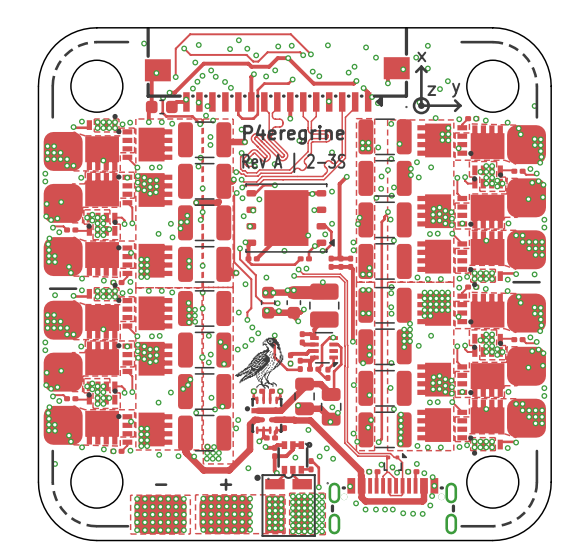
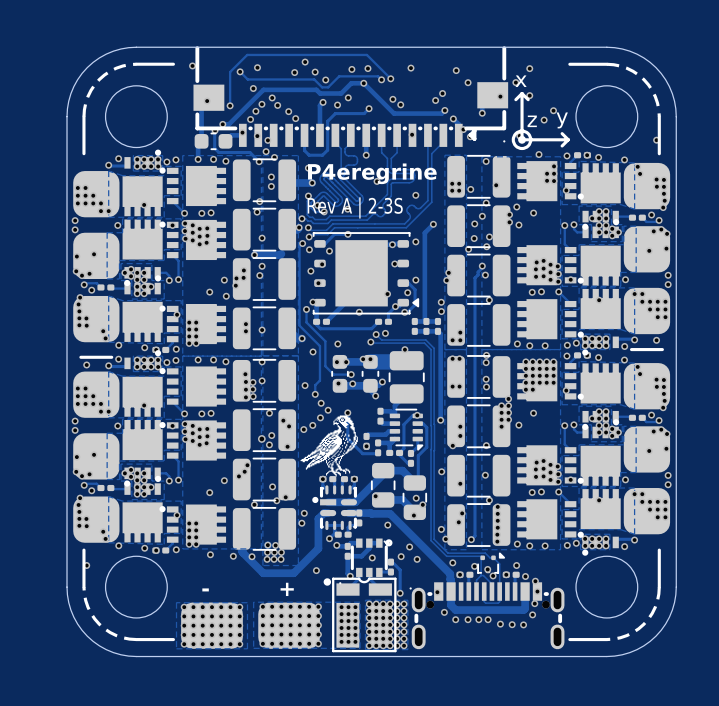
via: none -> (452, 562)

